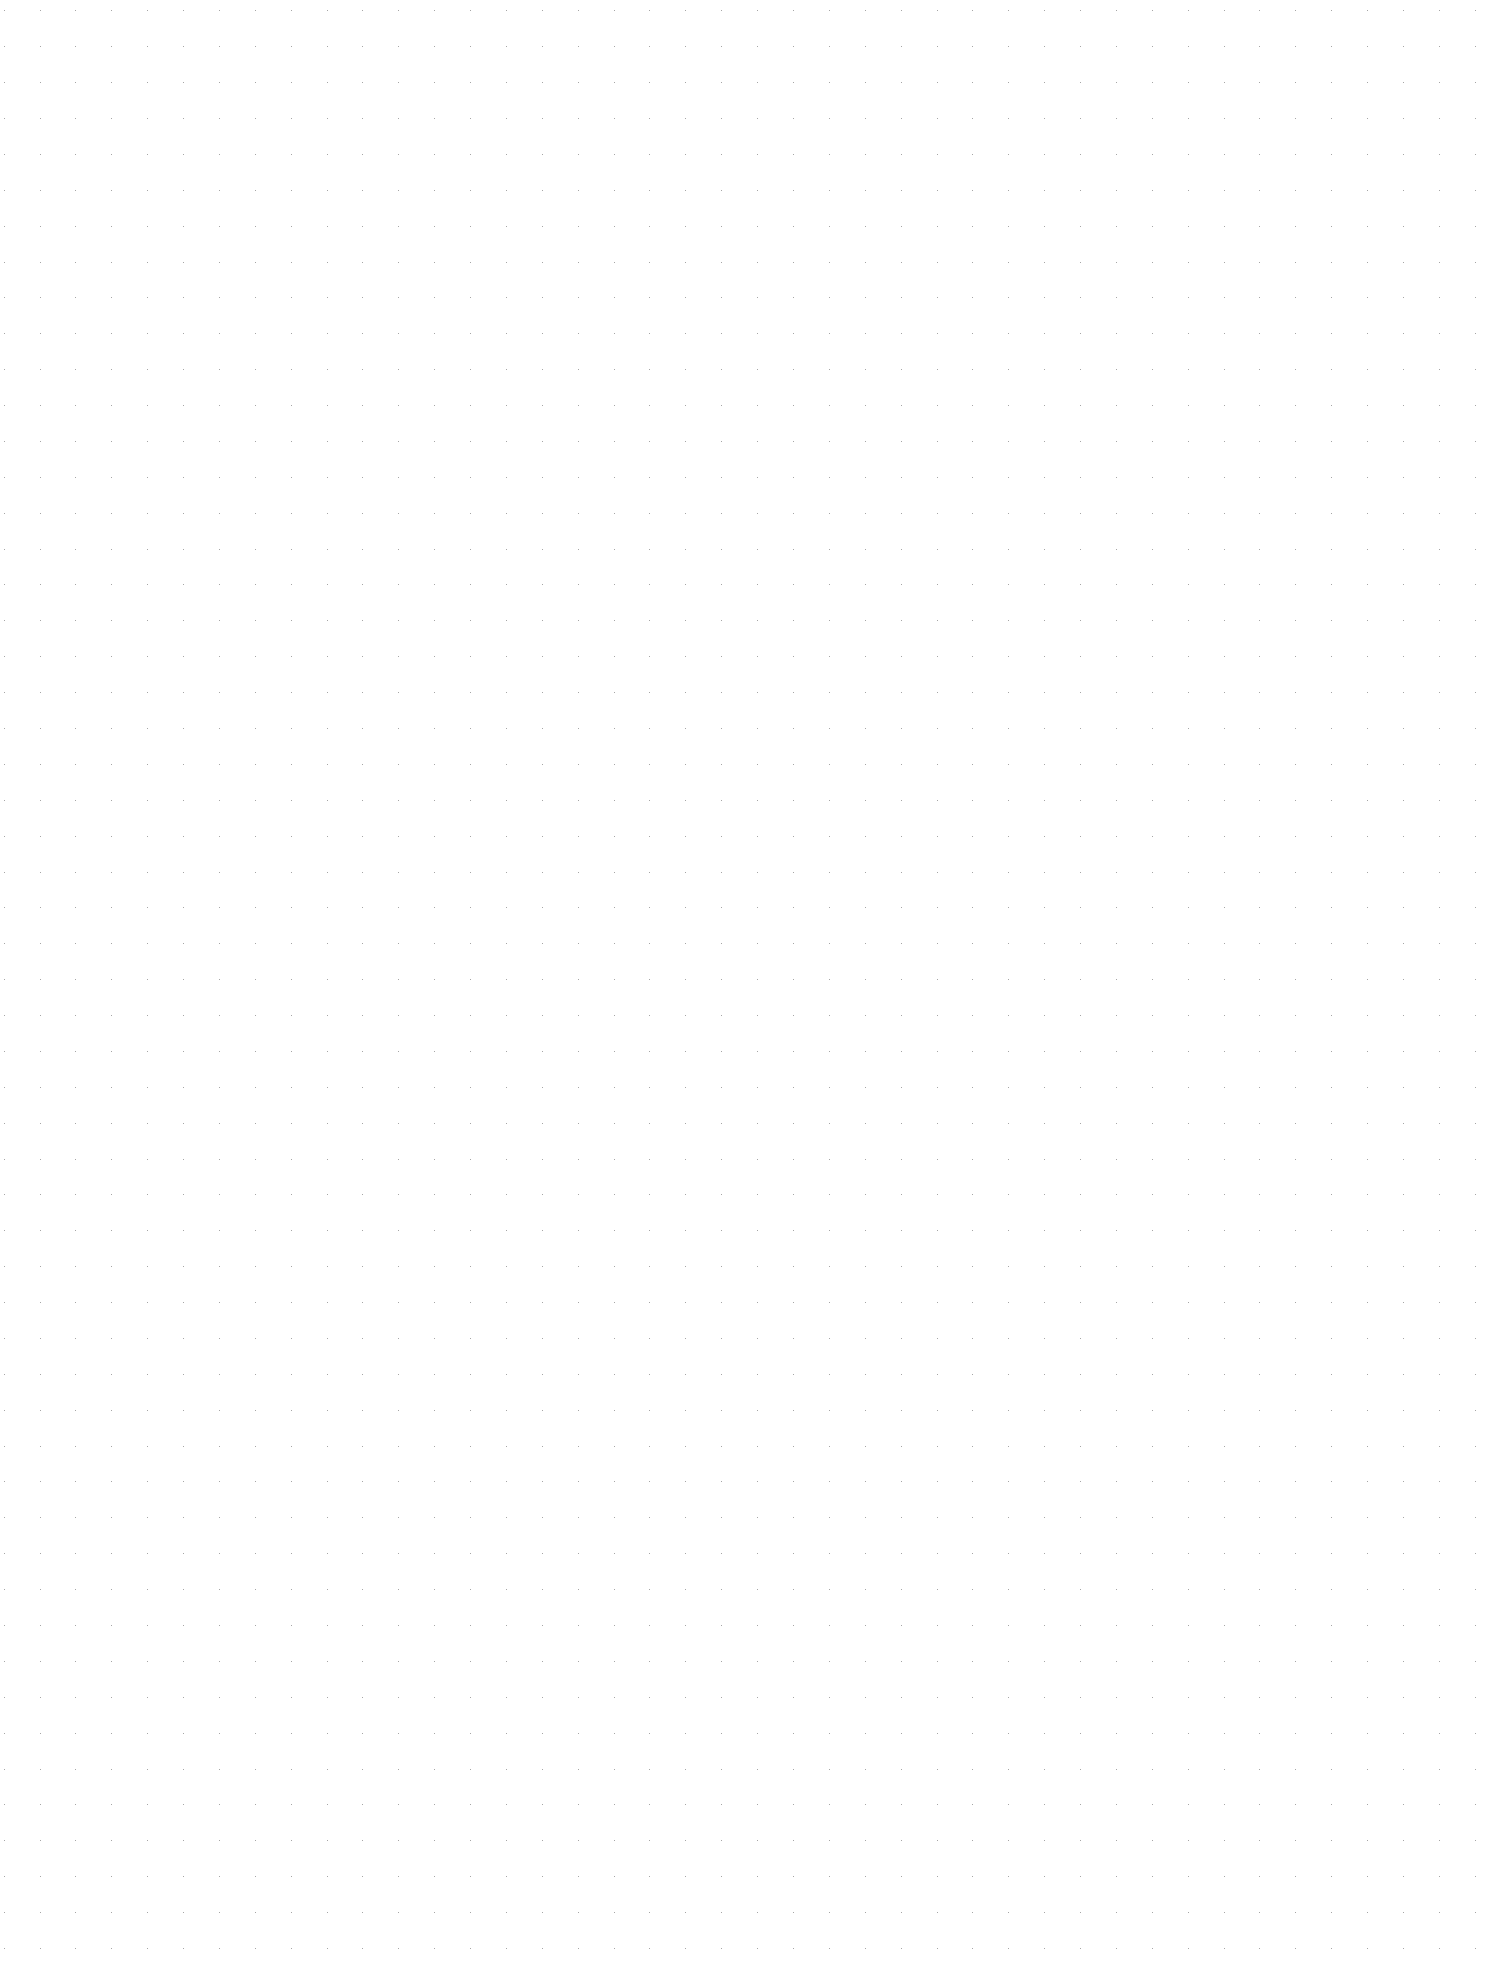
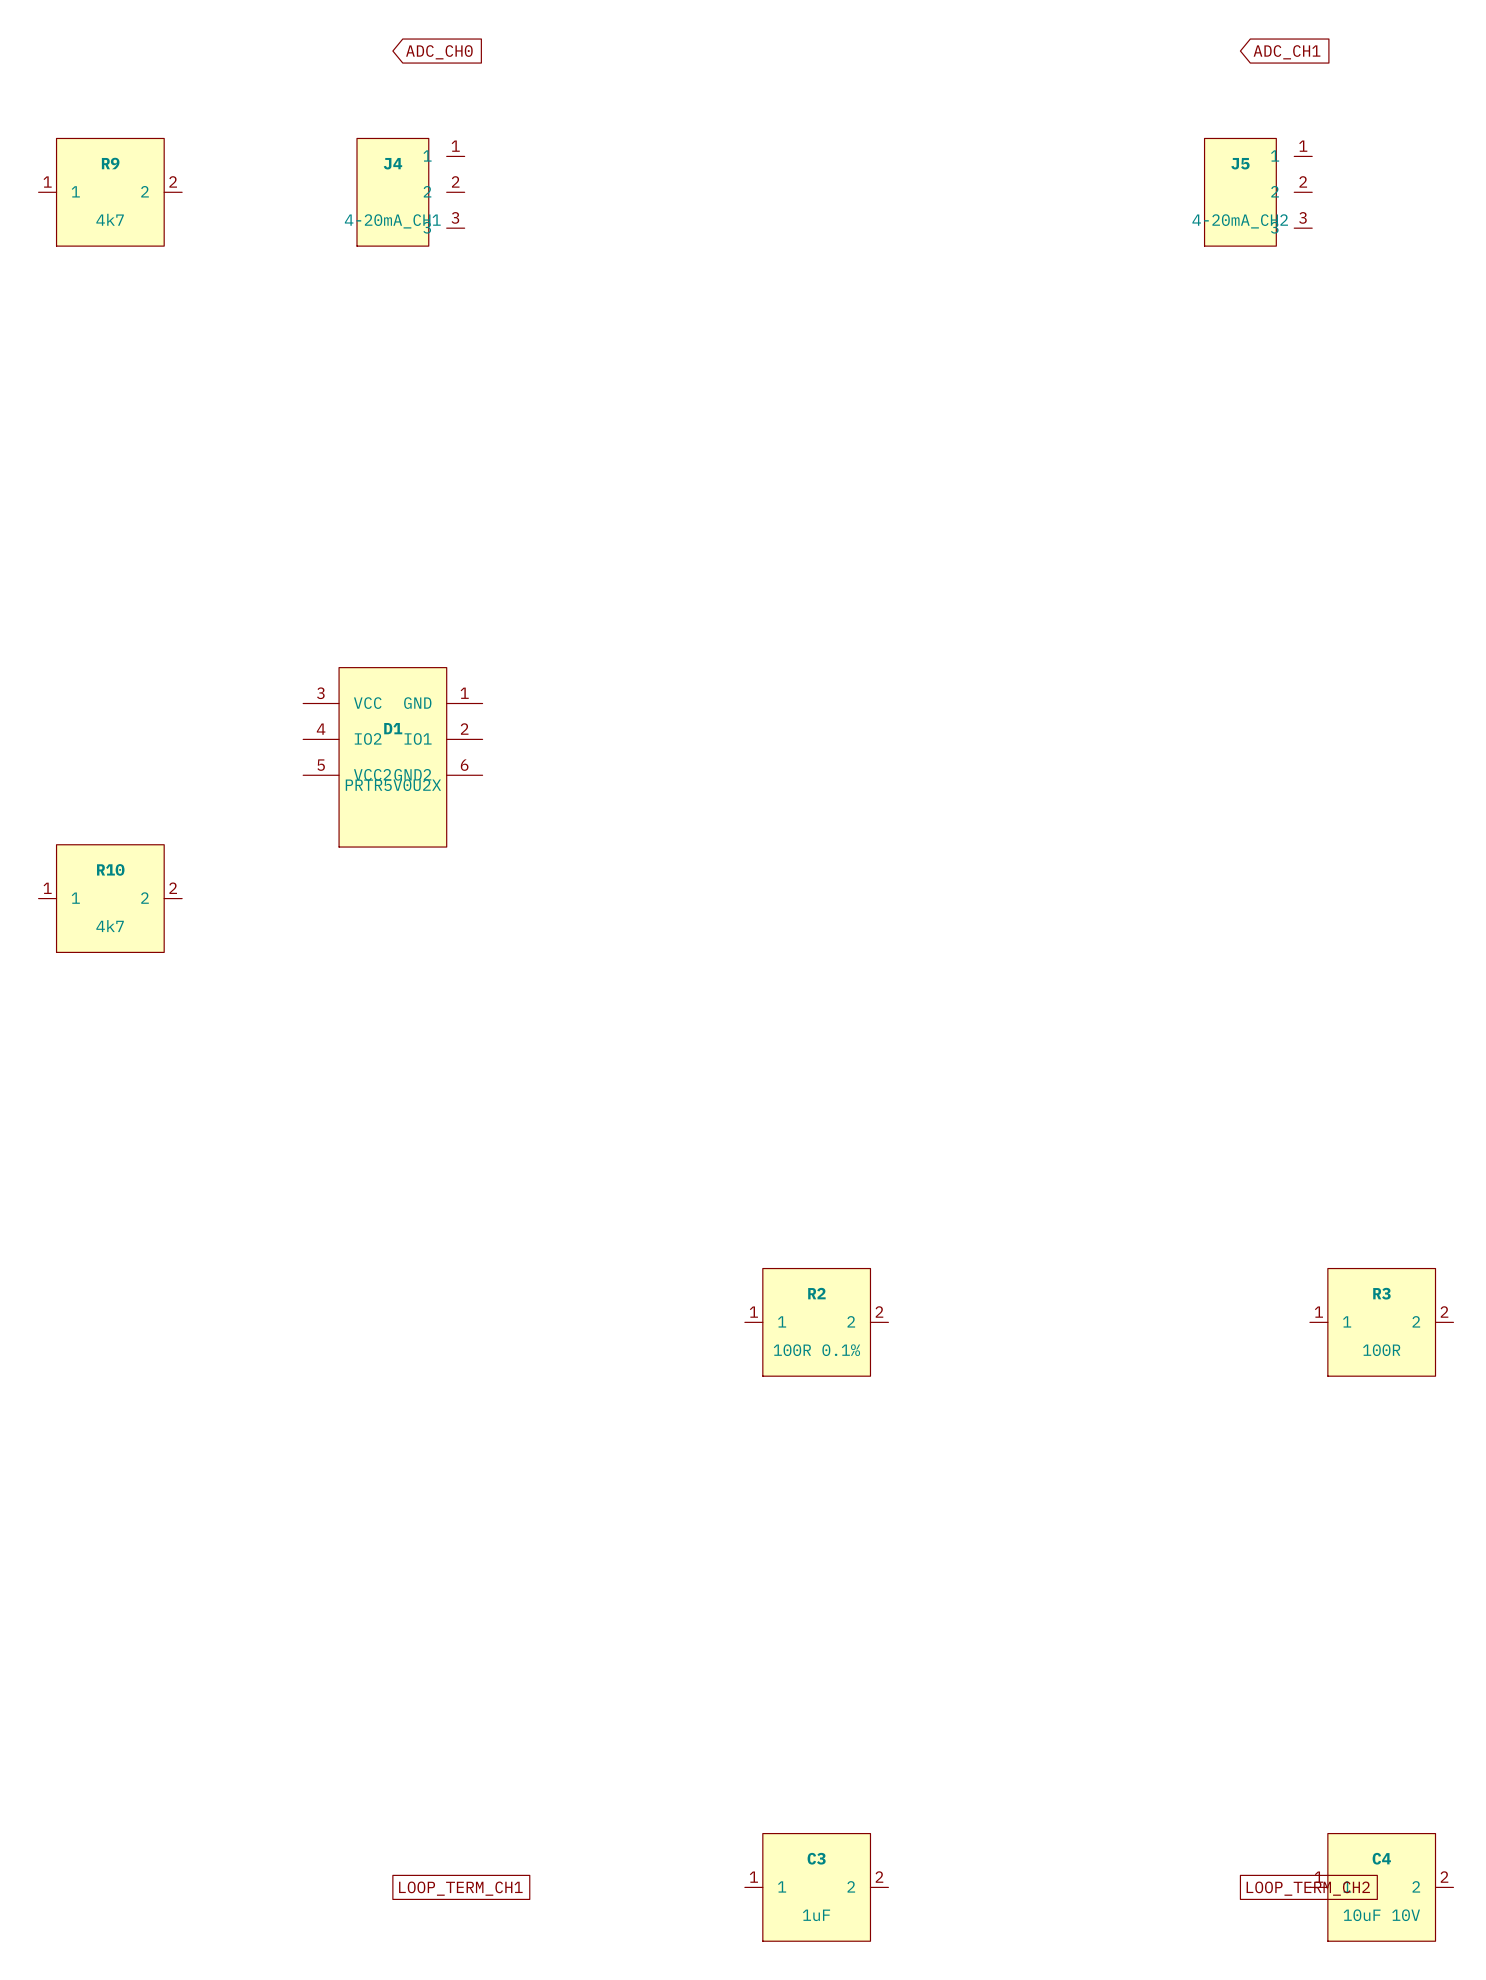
global label: none -> ADC_CH0 (439, 52)
global label: none -> ADC_CH1 (1287, 52)
R9: none -> 4k7 (110, 192)
J4: none -> 4-20mA_CH1 (410, 192)
J5: none -> 4-20mA_CH2 (1258, 192)
D1: none -> PRTR5V0U2X (392, 757)
R10: none -> 4k7 (110, 898)
R2: none -> 100R 0.1% (816, 1322)
R3: none -> 100R (1381, 1322)
global label: none -> LOOP_TERM_CH1 (460, 1888)
C3: none -> 1uF (816, 1887)
global label: none -> LOOP_TERM_CH2 (1308, 1888)
C4: none -> 10uF 10V (1381, 1887)

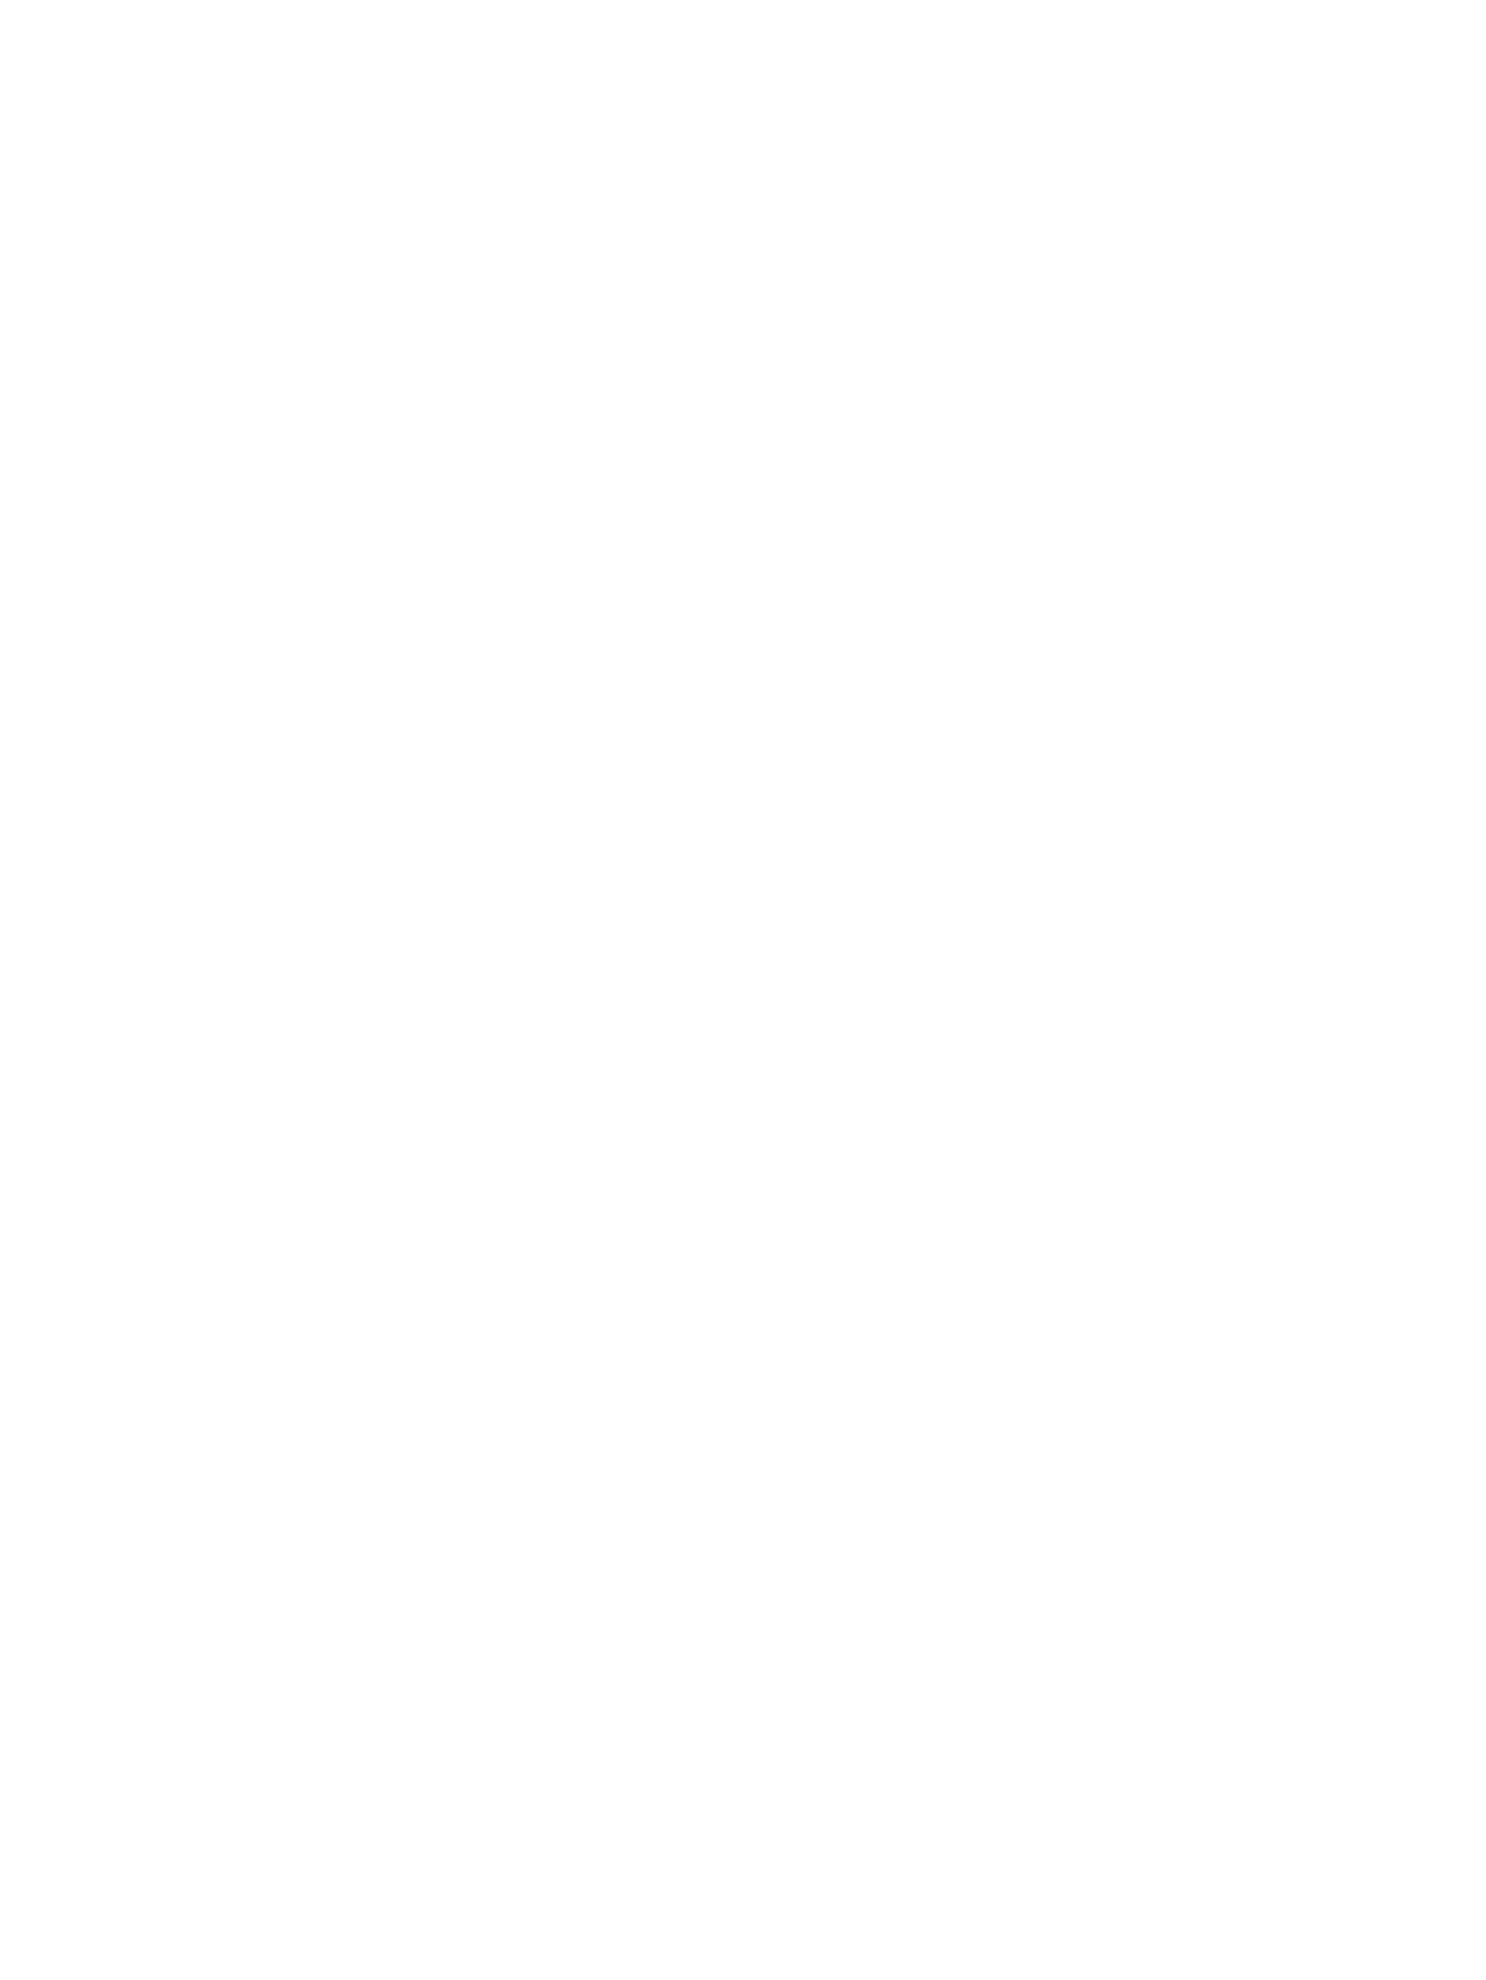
global label: ADC_CH0 (439, 52) -> none
global label: ADC_CH1 (1287, 52) -> none
R9: 4k7 (110, 192) -> none
J4: 4-20mA_CH1 (410, 192) -> none
J5: 4-20mA_CH2 (1258, 192) -> none
D1: PRTR5V0U2X (392, 757) -> none
R10: 4k7 (110, 898) -> none
R2: 100R 0.1% (816, 1322) -> none
R3: 100R (1381, 1322) -> none
C3: 1uF (816, 1887) -> none
C4: 10uF 10V (1381, 1887) -> none
global label: LOOP_TERM_CH1 (460, 1888) -> none
global label: LOOP_TERM_CH2 (1308, 1888) -> none

